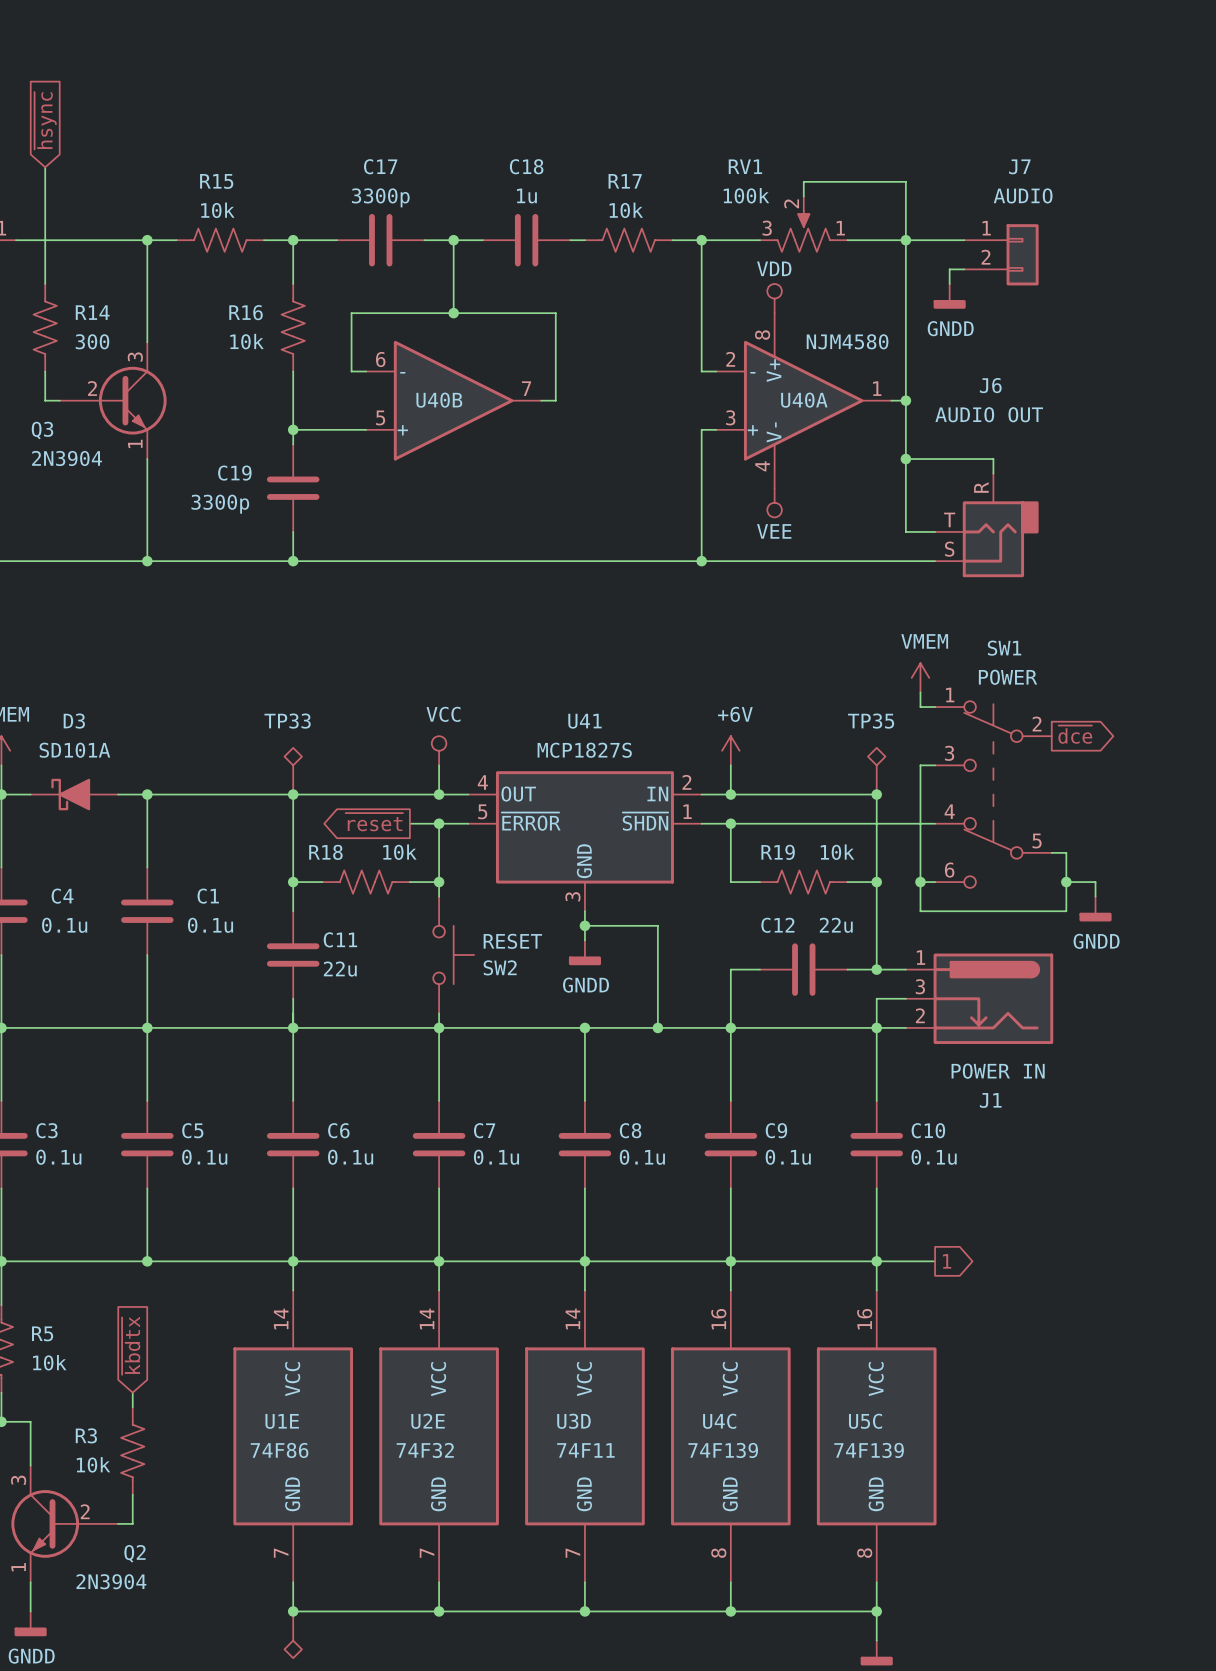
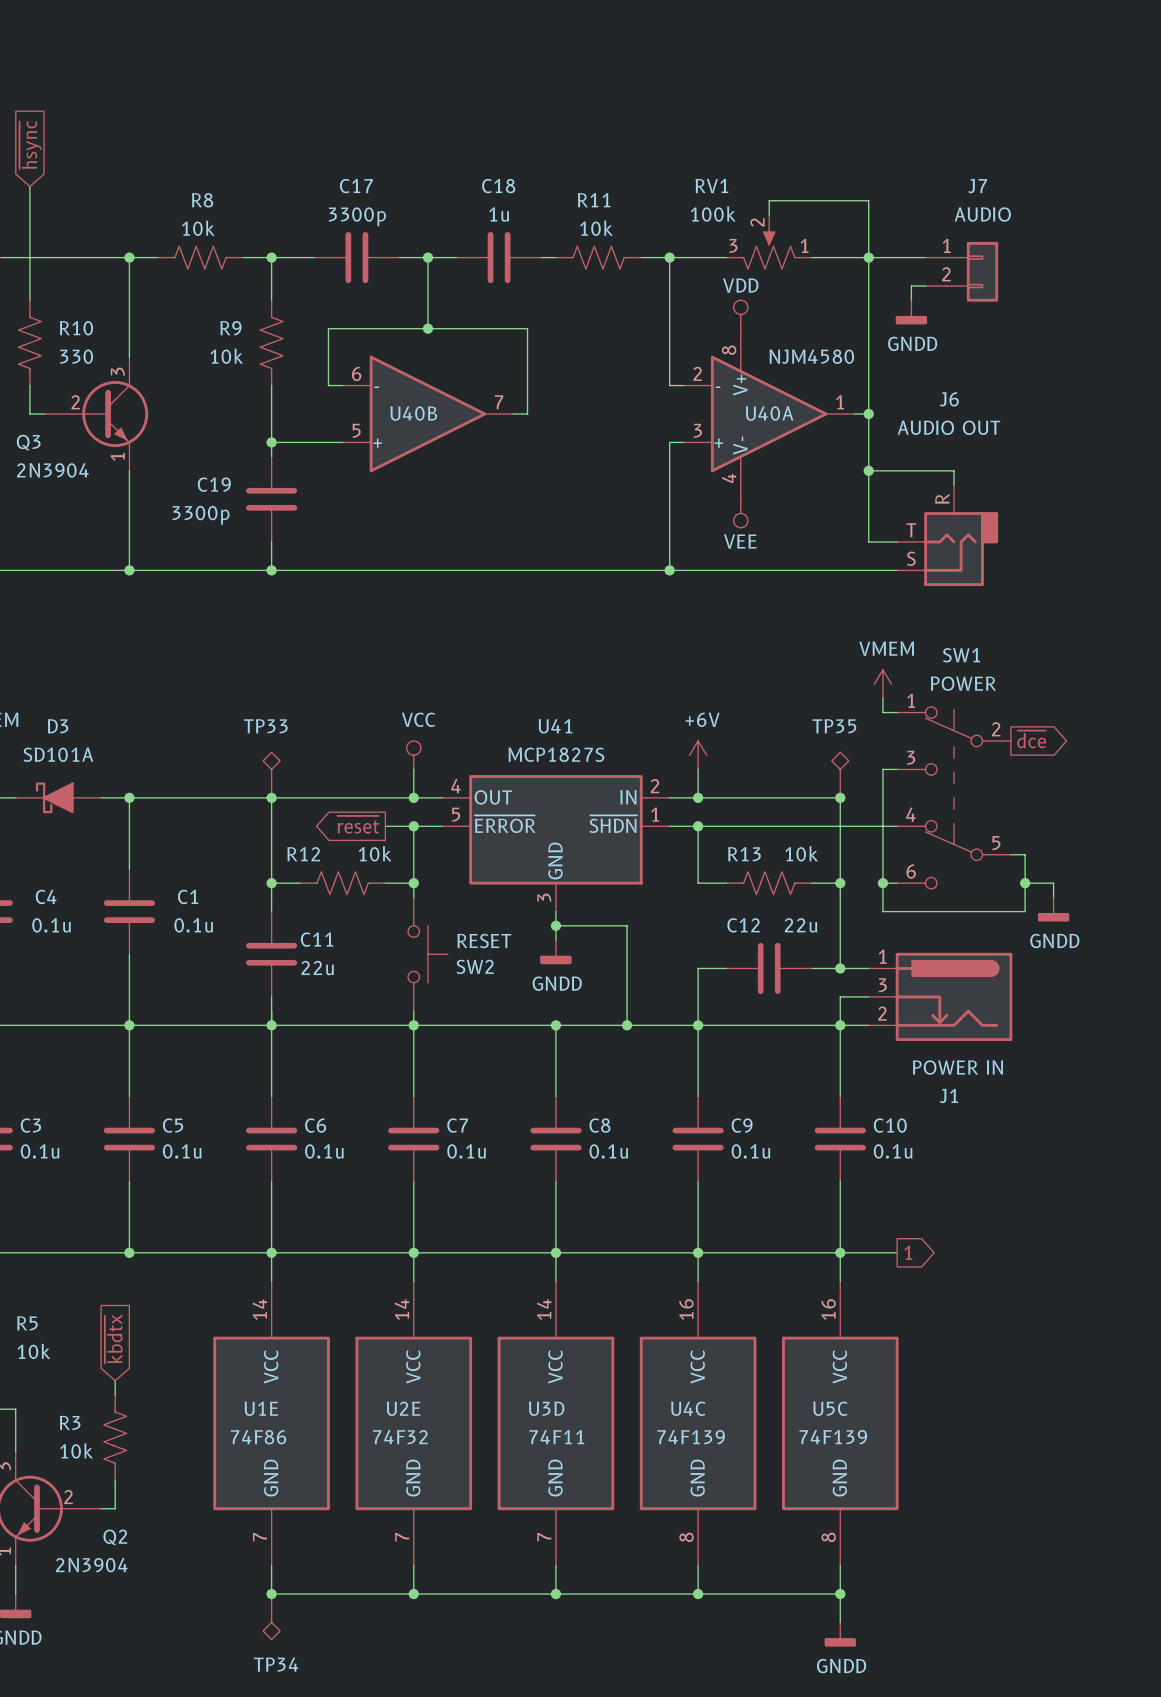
R15 name: R15 (216, 181) -> R8 (202, 200)
R17 name: R17 (625, 181) -> R11 (594, 200)
R14 name: R14 (92, 312) -> R10 (76, 328)
R16 name: R16 (246, 312) -> R9 (230, 328)
R14 value: 300 (92, 341) -> 330 (76, 356)
R18 name: R18 (325, 852) -> R12 (303, 854)
R19 name: R19 (778, 852) -> R13 (744, 854)

